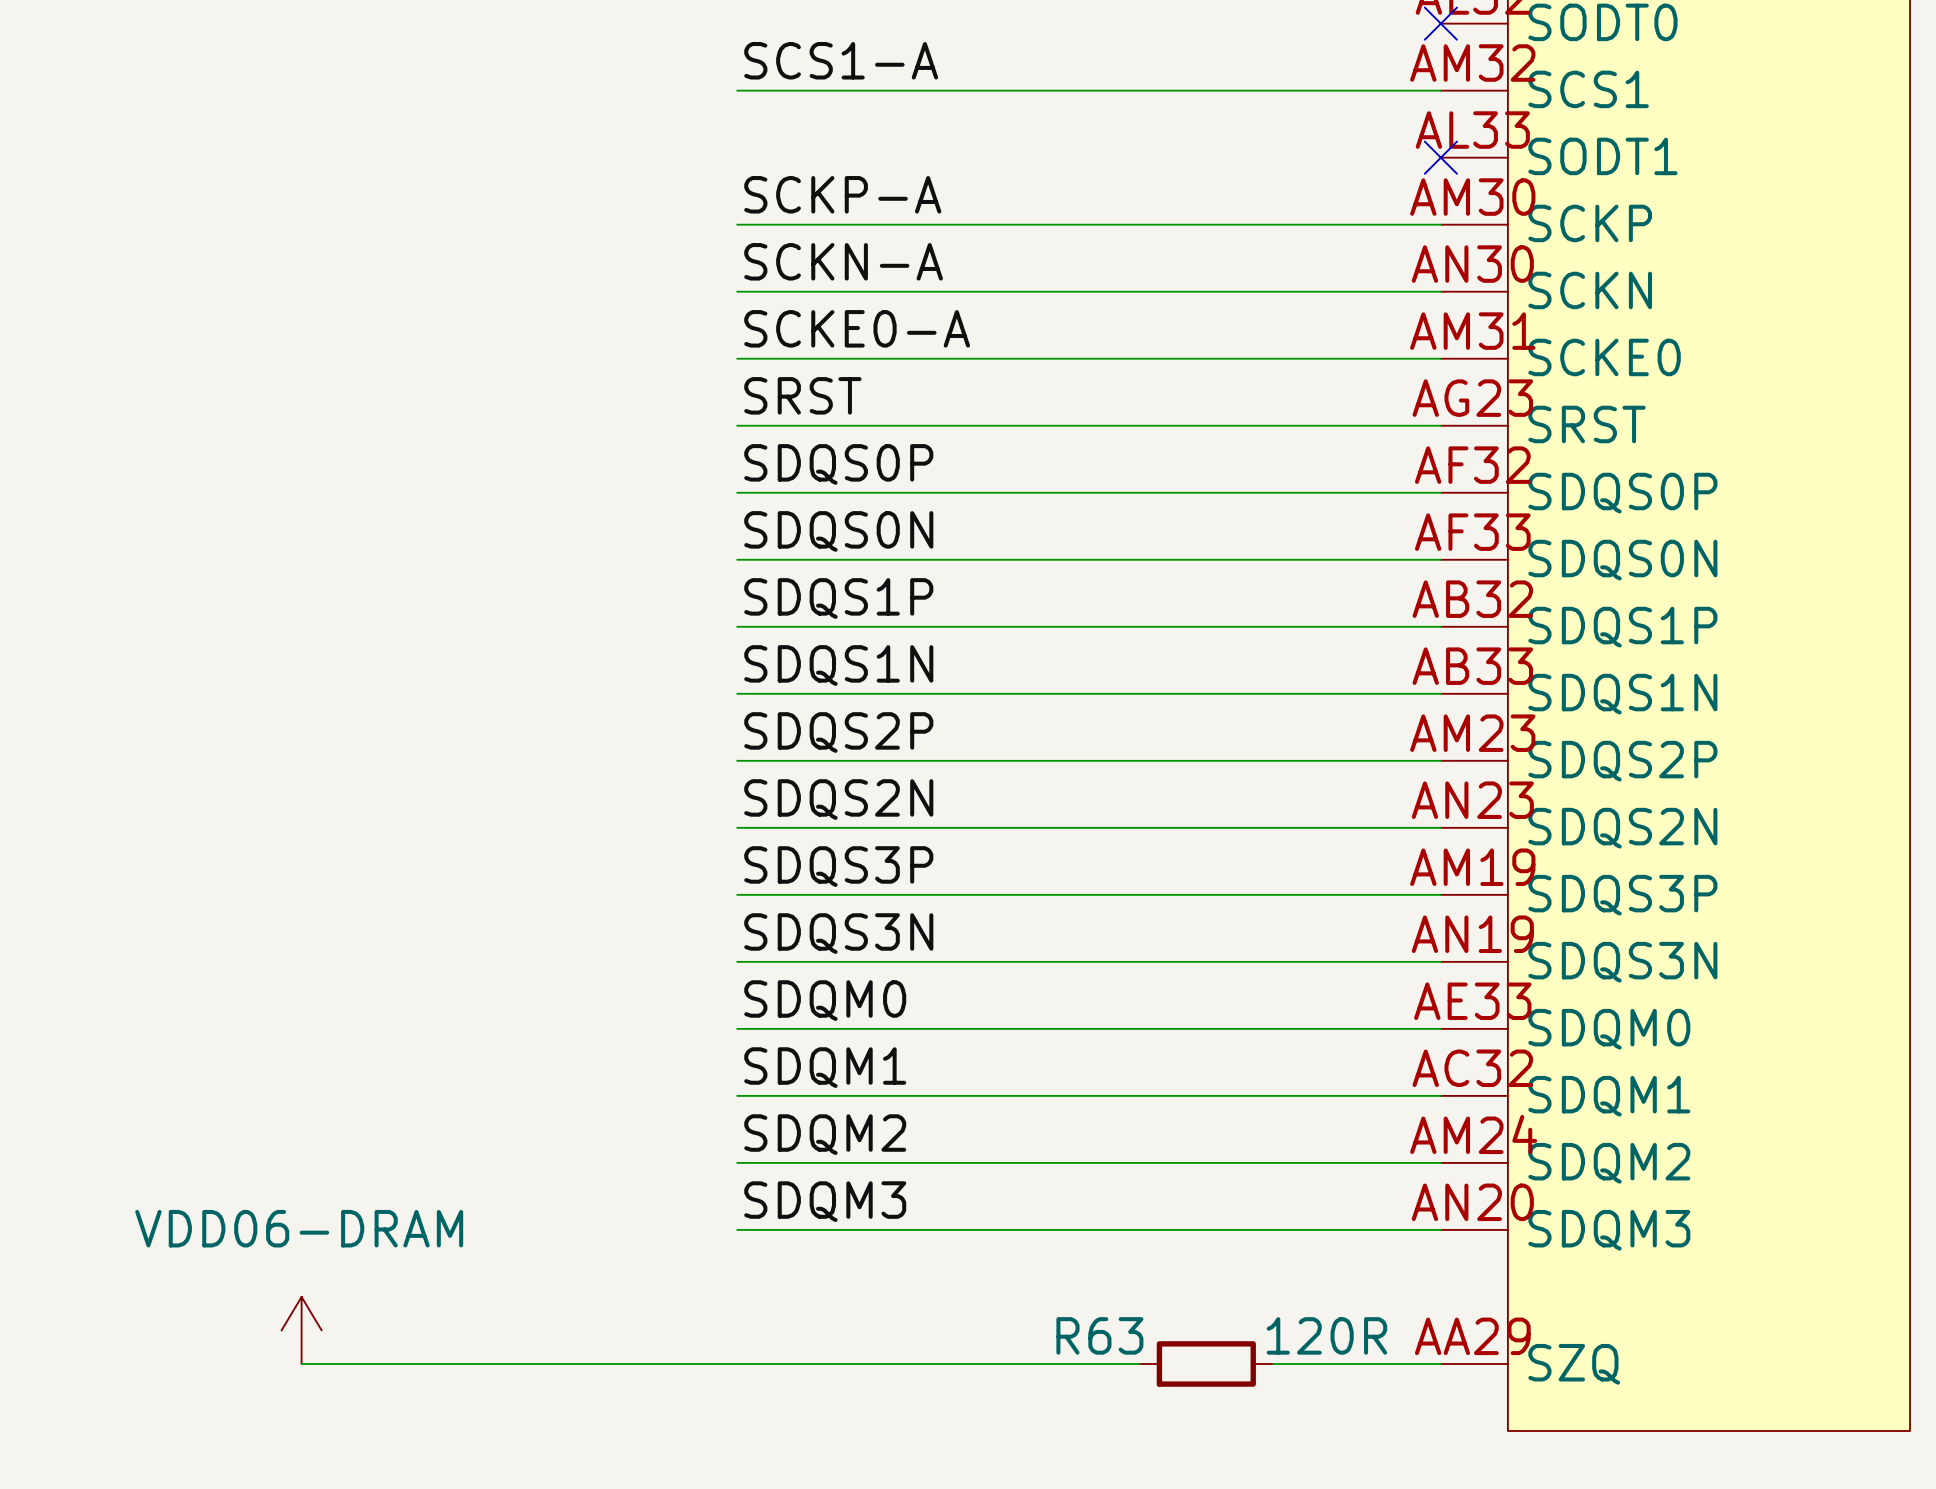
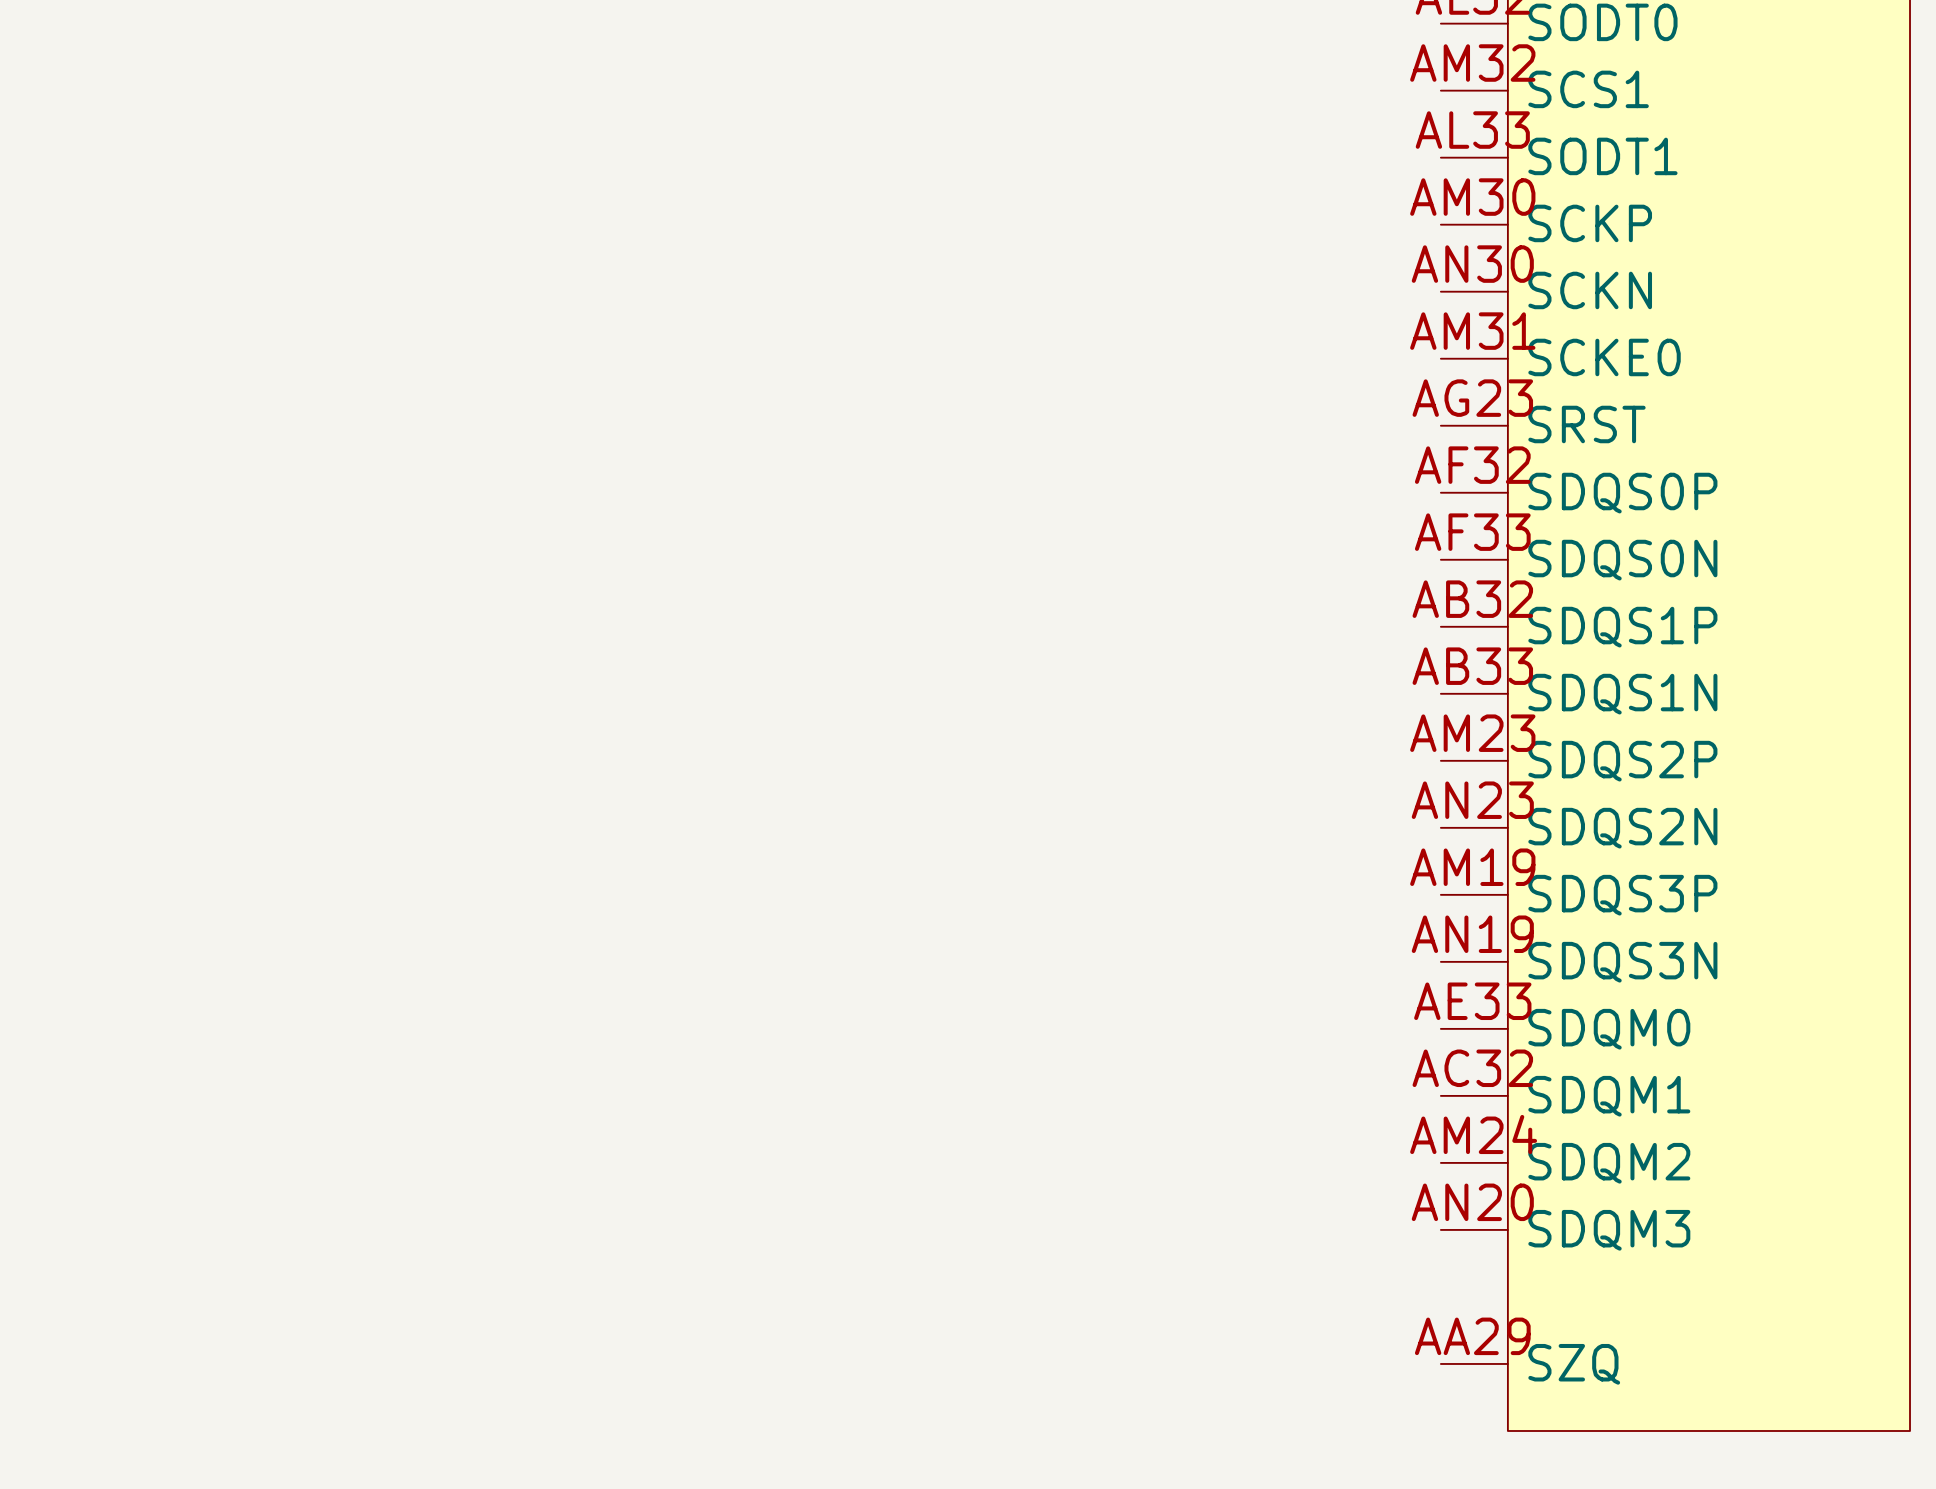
no-connect mark: (1440, 23) -> none
label: SCS1-A (841, 60) -> none
wire: (737, 90) (1440, 90) -> none
no-connect mark: (1440, 157) -> none
label: SCKP-A (842, 194) -> none
wire: (737, 224) (1440, 224) -> none
label: SCKN-A (843, 261) -> none
wire: (737, 291) (1440, 291) -> none
label: SCKE0-A (857, 328) -> none
wire: (737, 358) (1440, 358) -> none
label: SRST (802, 395) -> none
wire: (737, 425) (1440, 425) -> none
label: SDQS0P (838, 464) -> none
wire: (737, 492) (1440, 492) -> none
label: SDQS0N (838, 531) -> none
wire: (737, 559) (1440, 559) -> none
label: SDQS1P (838, 598) -> none
wire: (737, 626) (1440, 626) -> none
label: SDQS1N (838, 665) -> none
wire: (737, 693) (1440, 693) -> none
label: SDQS2P (838, 732) -> none
wire: (737, 760) (1440, 760) -> none
label: SDQS2N (838, 799) -> none
wire: (737, 827) (1440, 827) -> none
label: SDQS3P (838, 866) -> none
wire: (737, 894) (1440, 894) -> none
label: SDQS3N (838, 933) -> none
wire: (737, 961) (1440, 961) -> none
label: SDQM0 (825, 1000) -> none
wire: (737, 1028) (1440, 1028) -> none
label: SDQM1 (825, 1067) -> none
wire: (737, 1095) (1440, 1095) -> none
label: SDQM2 (825, 1134) -> none
wire: (737, 1162) (1440, 1162) -> none
label: SDQM3 (825, 1201) -> none
wire: (737, 1229) (1440, 1229) -> none
power symbol: VDD06-DRAM (301, 1330) -> none
wire: (301, 1363) (1139, 1363) -> none
R63: 120R (1206, 1363) -> none
wire: (1273, 1363) (1440, 1363) -> none

